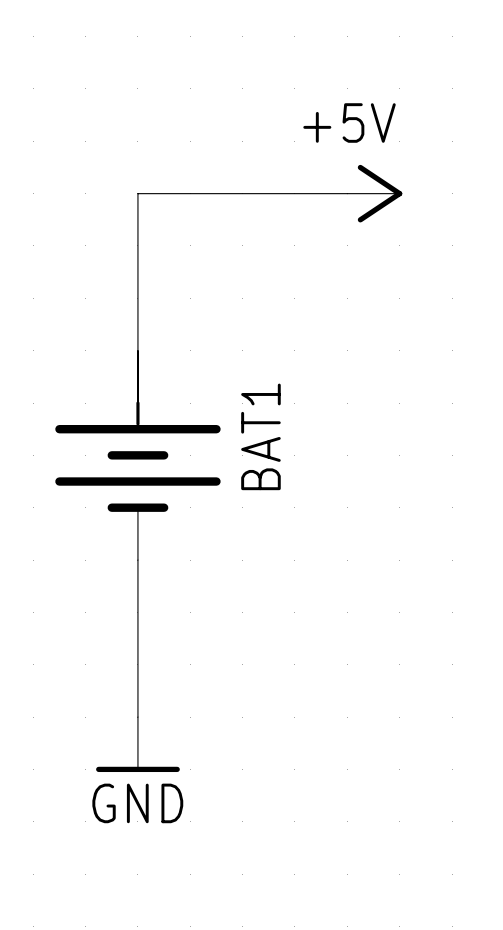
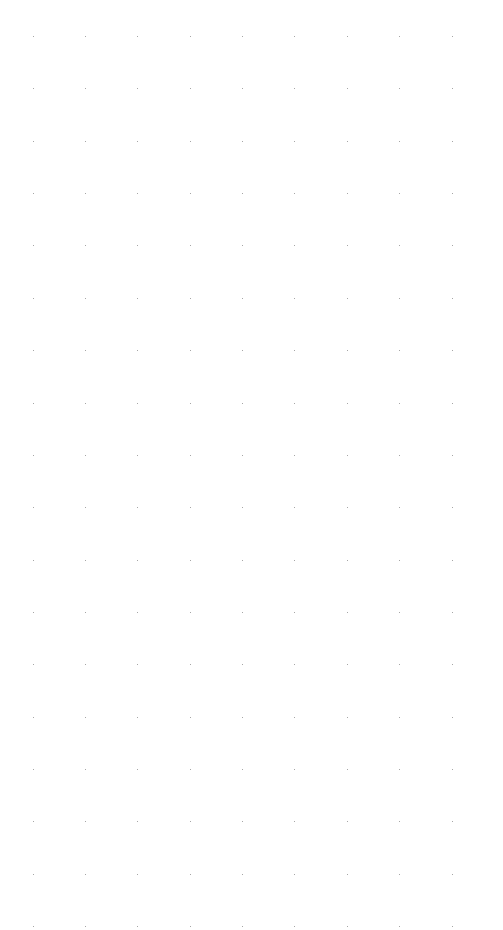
wire: (347, 193) (137, 193) (137, 350) -> none
power symbol: +5V (374, 193) -> none
BAT1: (137, 455) -> none
wire: (137, 560) (137, 717) -> none
power symbol: GND (137, 744) -> none

